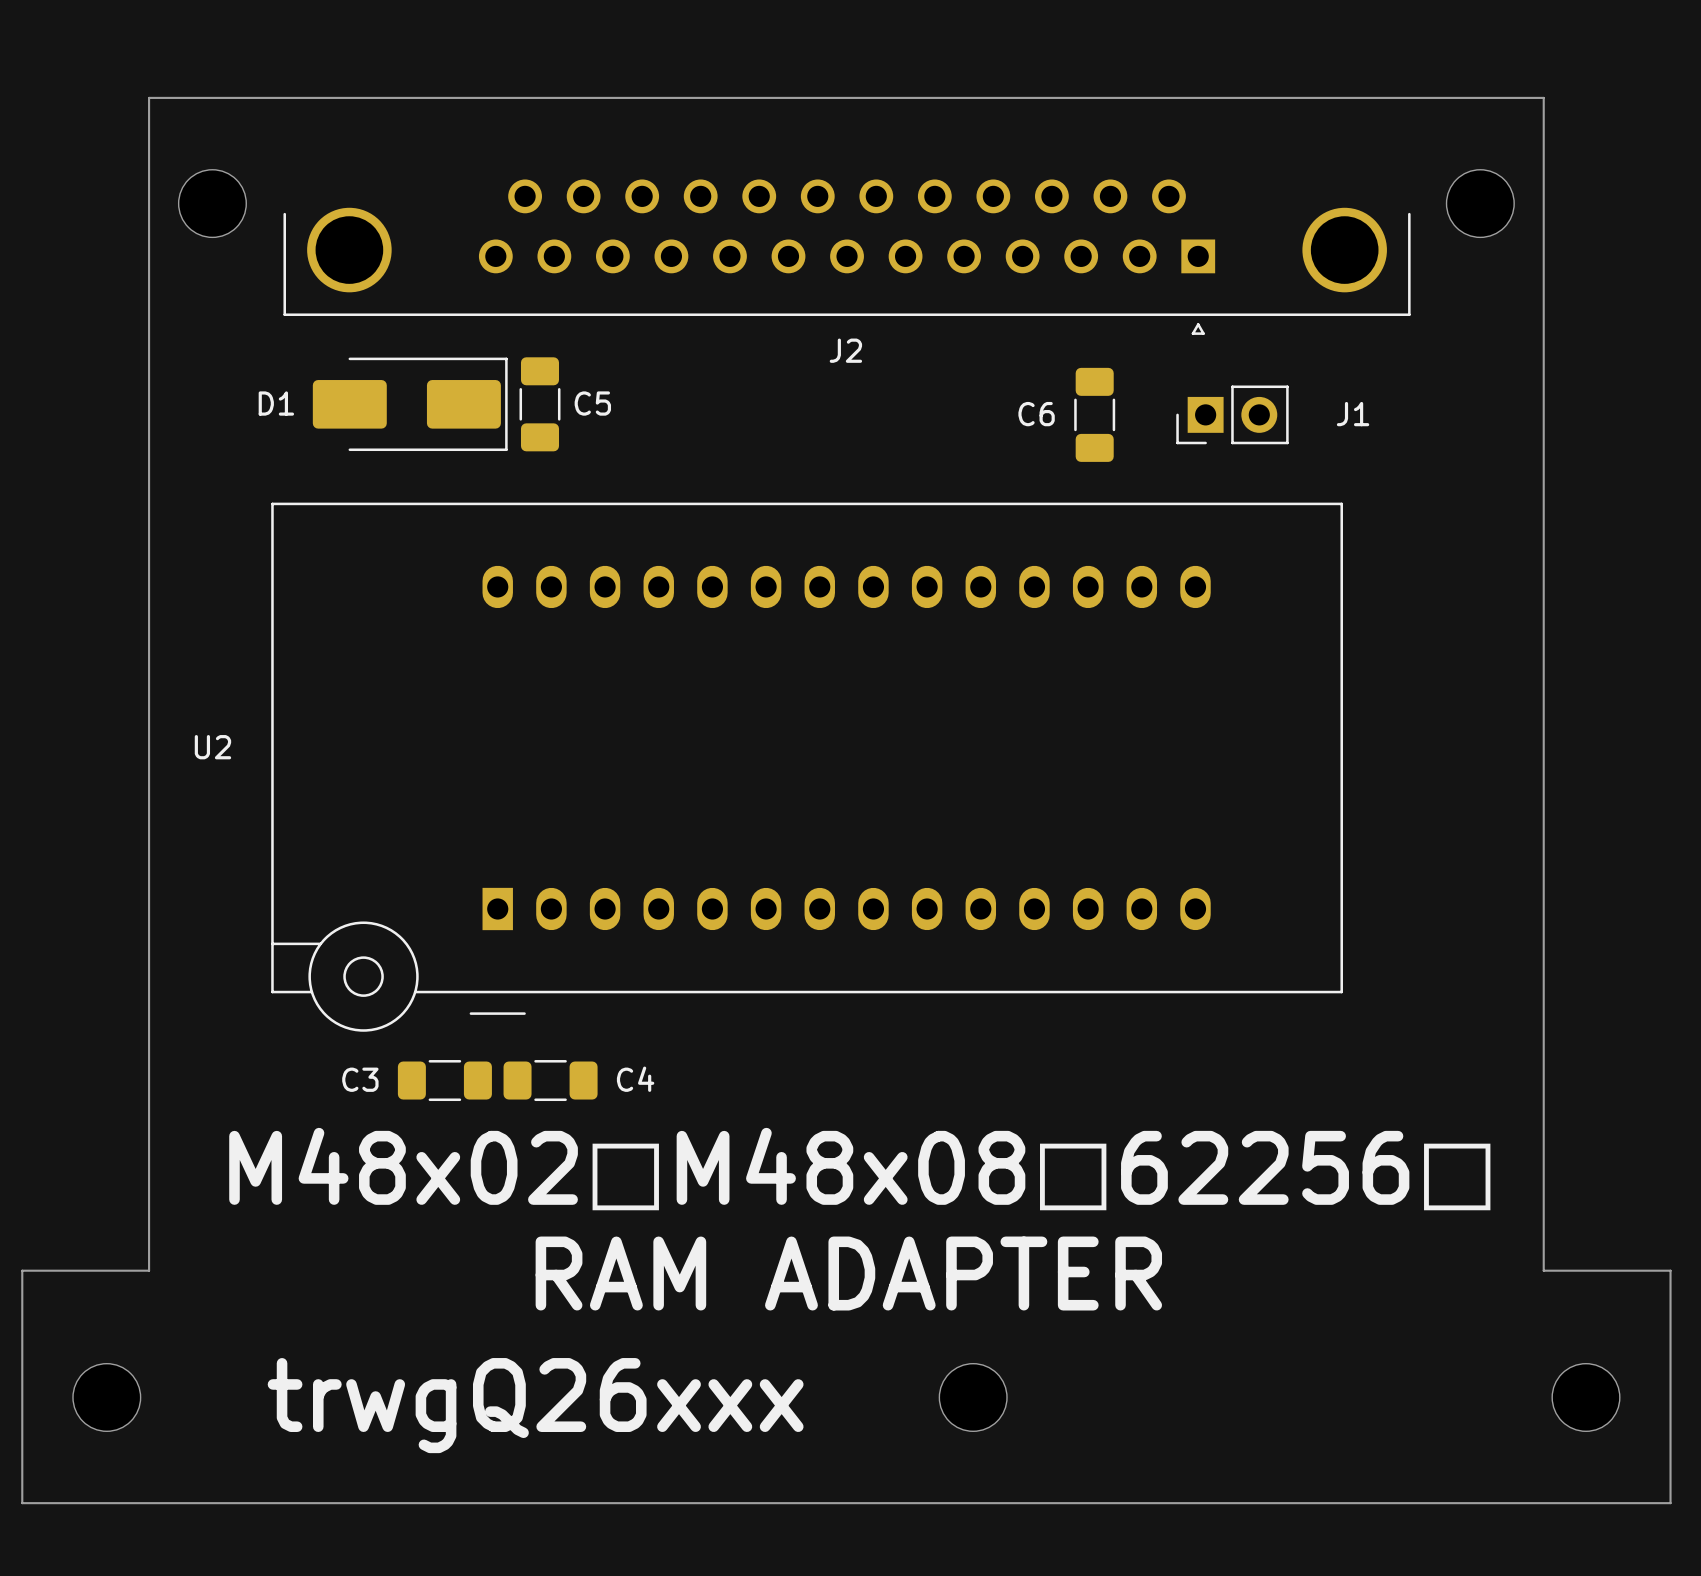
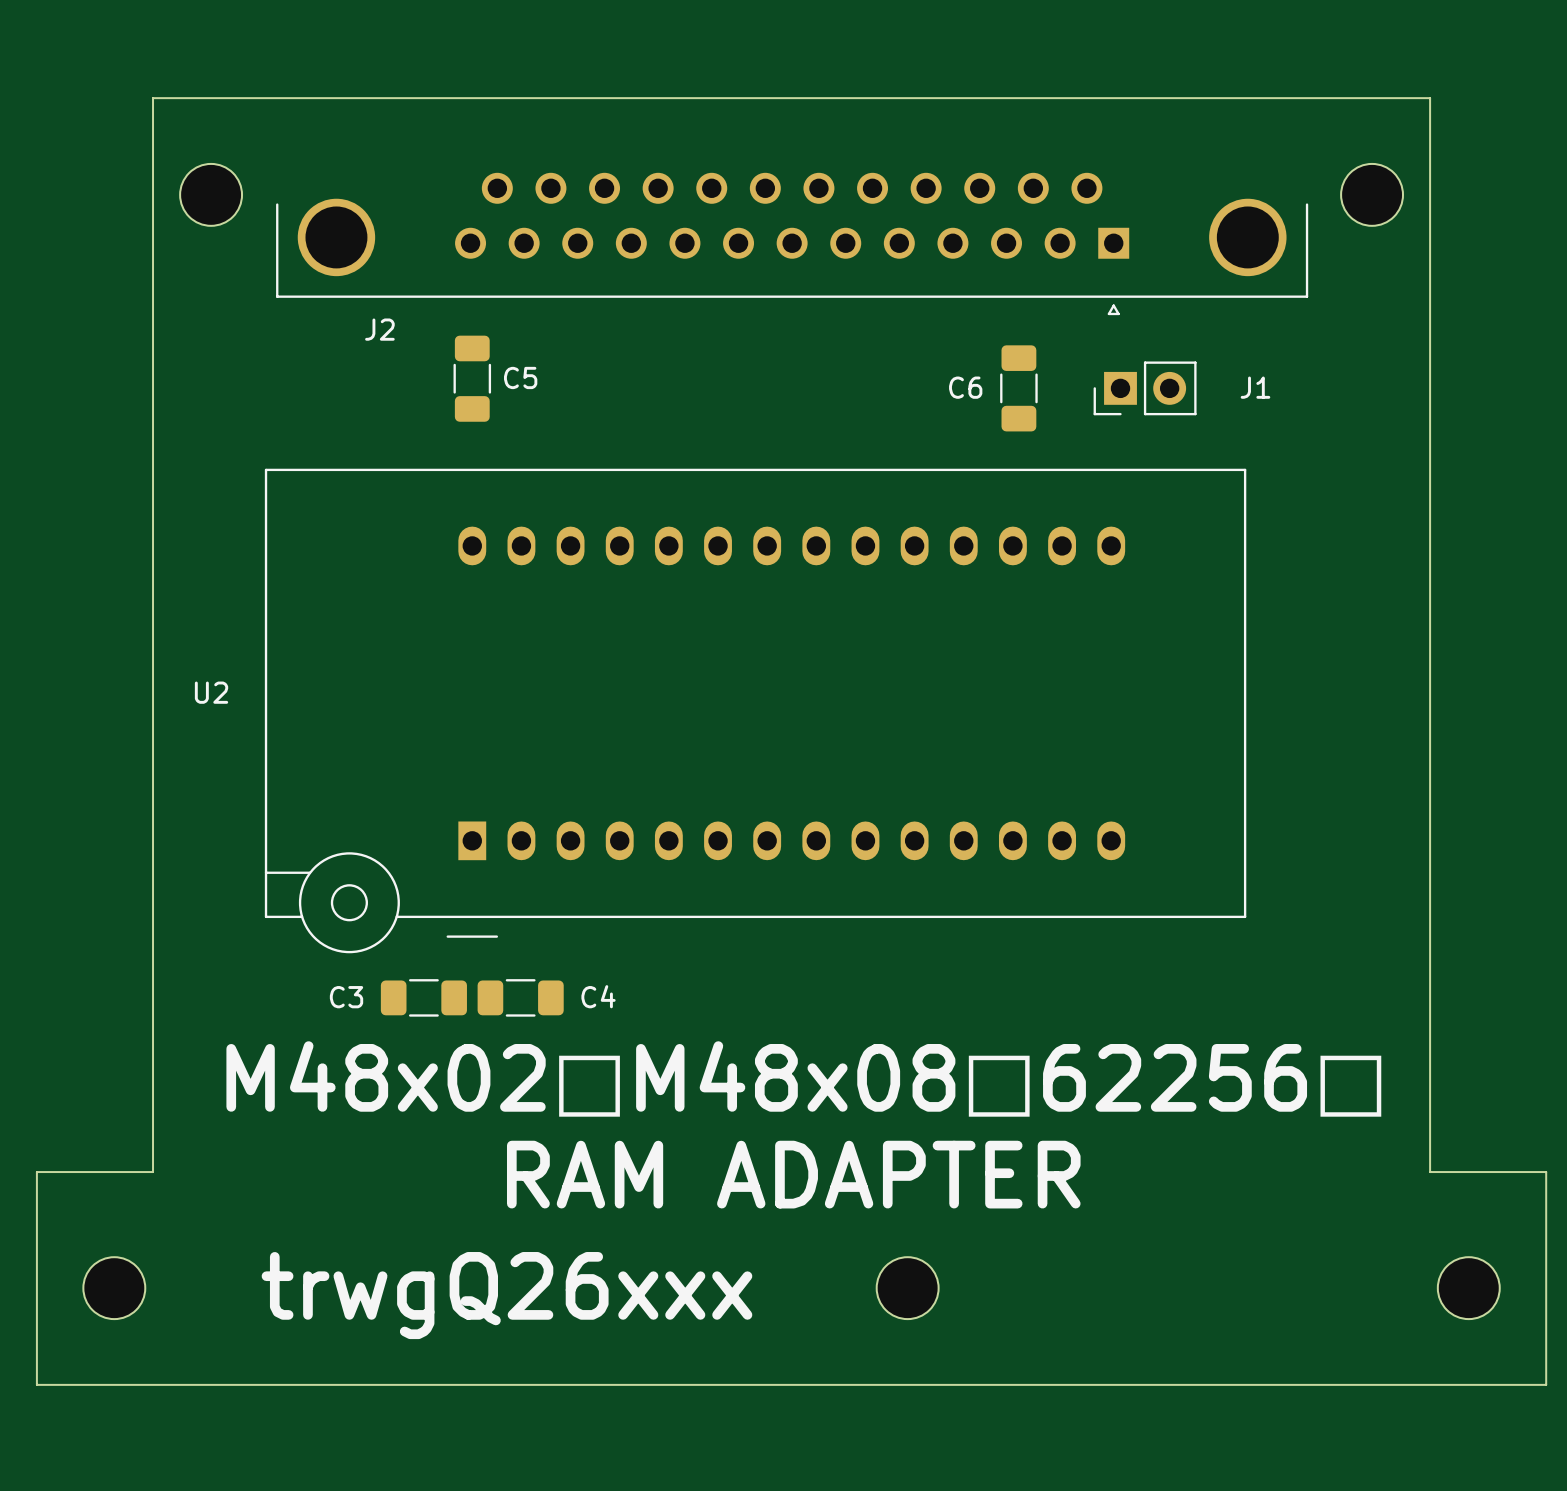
J2 name position: J2 (845, 350) -> J2 (379, 329)
D1: (410, 404) -> none
C5 position: (539, 404) -> (472, 378)

